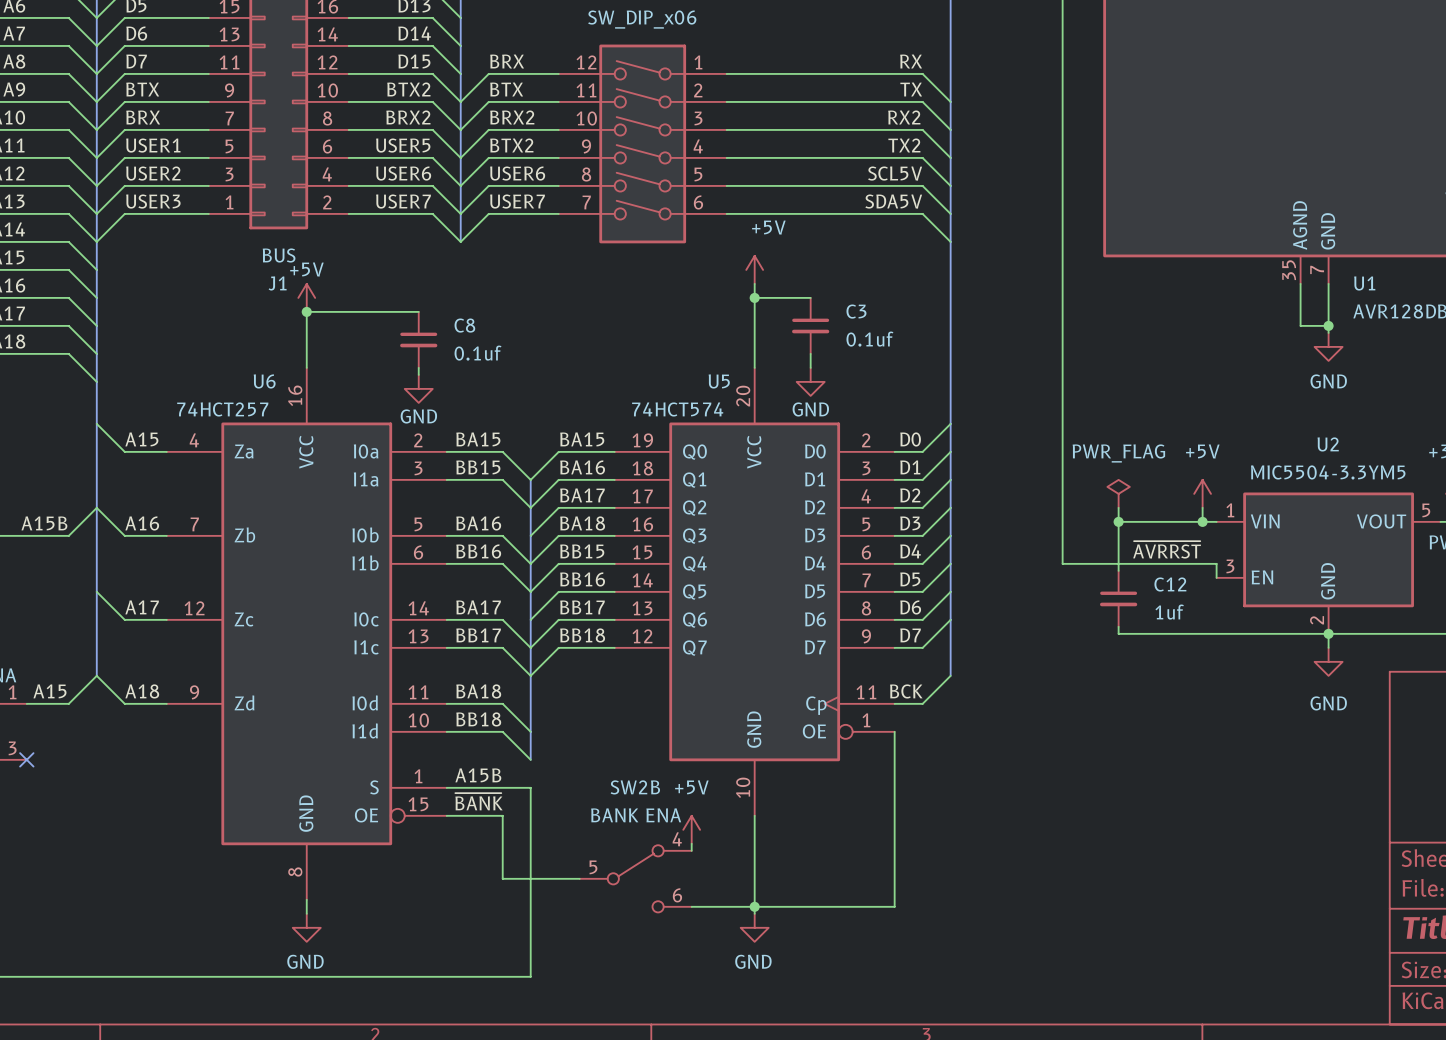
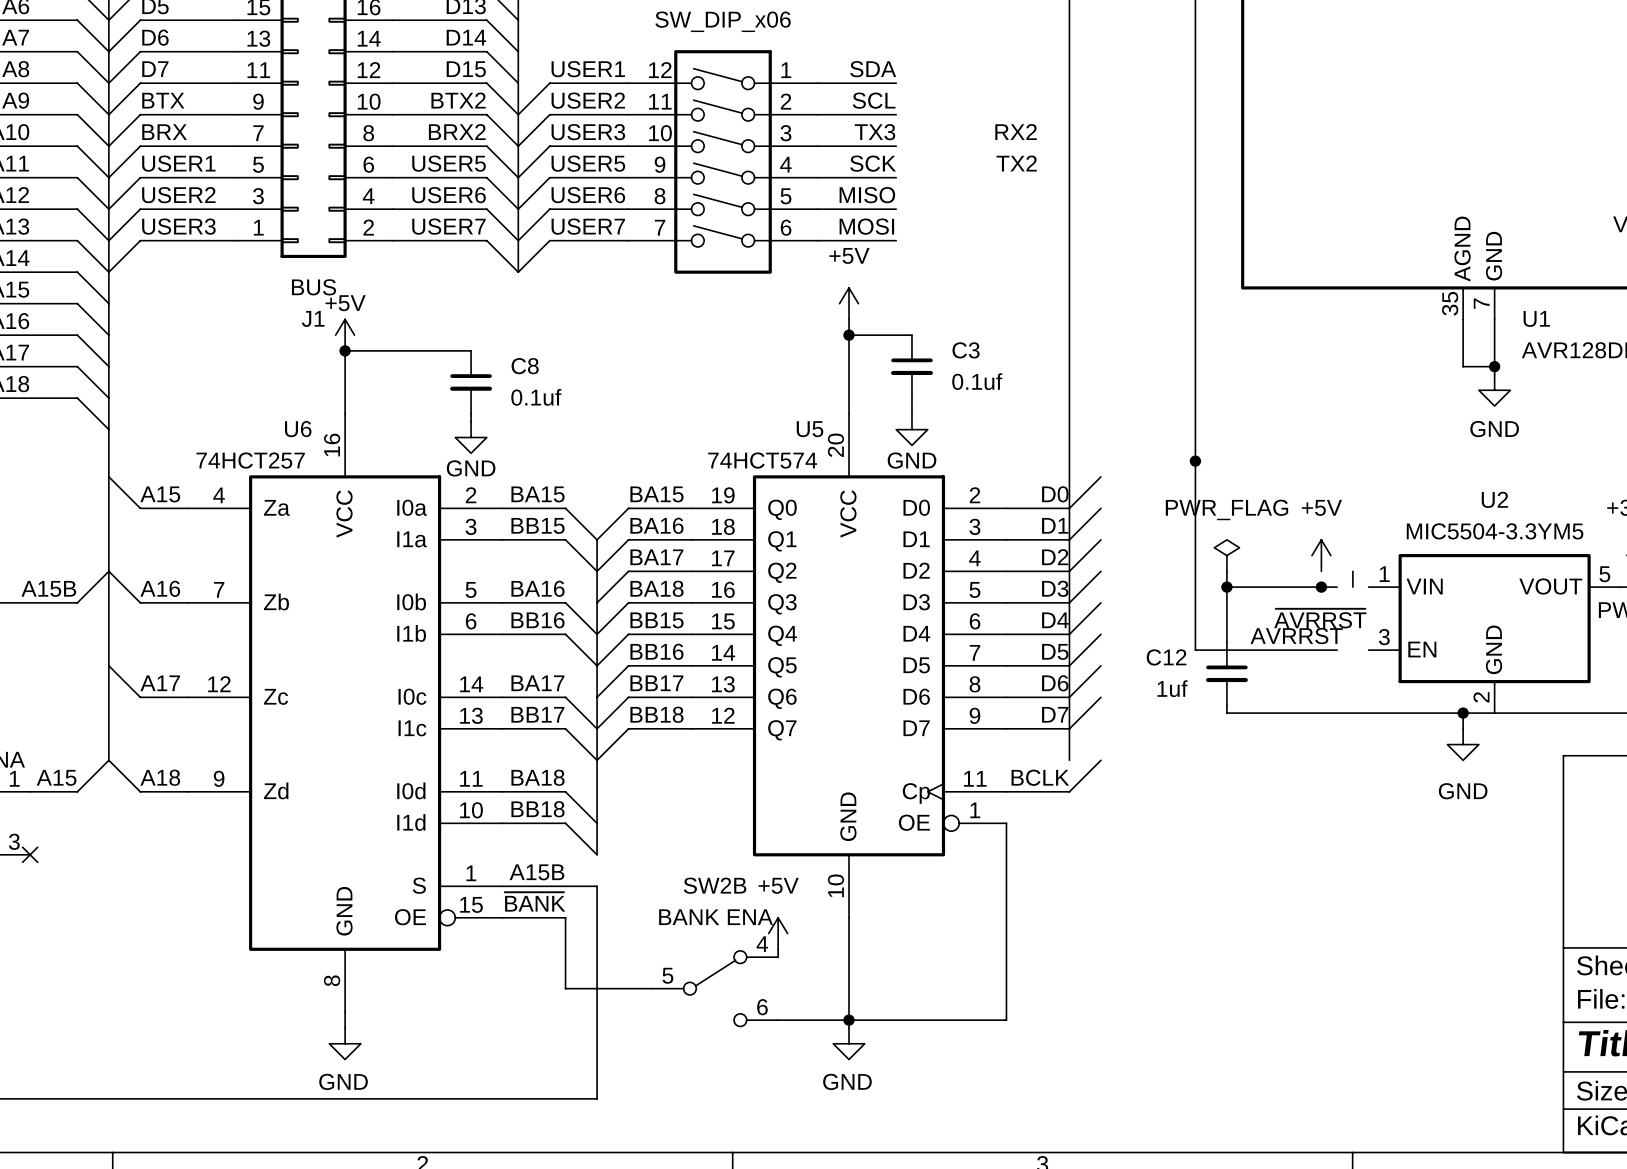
label: BRX (507, 61) -> USER1 (588, 69)
label: none -> SDA (873, 69)
label: RX (911, 61) -> none
wire: (796, 73) (922, 73) (950, 101) -> none
label: BTX (506, 89) -> USER2 (588, 100)
label: none -> SCL (874, 100)
label: TX (911, 89) -> none
wire: (796, 101) (922, 101) (950, 129) -> none
label: BRX2 (512, 117) -> USER3 (588, 132)
label: none -> TX3 (875, 132)
wire: (796, 129) (922, 129) (950, 157) -> none
label: BTX2 (511, 145) -> USER5 (588, 163)
label: none -> SCK (873, 163)
wire: (796, 157) (922, 157) (950, 185) -> none
label: none -> MISO (867, 195)
label: SCL5V (895, 173) -> none
wire: (796, 185) (922, 185) (950, 213) -> none
label: none -> MOSI (866, 226)
label: SDA5V (893, 201) -> none
wire: (796, 213) (922, 213) (950, 241) -> none
power symbol text position: +5V (768, 227) -> +5V (849, 255)
junction: none -> (1195, 461)
wire: (950, 423) (922, 451) -> (1100, 476) (1069, 508) (1037, 508)
label position: D0 (910, 439) -> D0 (1055, 494)
wire: (950, 451) (922, 479) -> (1100, 508) (1069, 539) (1037, 539)
label position: D1 (910, 467) -> D1 (1055, 525)
wire: (950, 479) (922, 507) -> (1100, 539) (1069, 571) (1037, 571)
power symbol position: PWR_FLAG (1118, 493) -> PWR_FLAG (1226, 555)
power symbol position: +5V (1202, 493) -> +5V (1321, 555)
label position: D2 (910, 495) -> D2 (1055, 557)
wire: (950, 507) (922, 535) -> (1100, 571) (1069, 602) (1037, 602)
wire: (1118, 507) (1118, 570) -> (1226, 571) (1226, 642)
junction: none -> (1226, 587)
junction: (1118, 521) -> none
junction: none -> (1321, 587)
wire: (1188, 521) (1216, 521) -> (1226, 587) (1258, 587)
junction: (1202, 521) -> none
label position: D3 (910, 523) -> D3 (1055, 588)
wire: (950, 535) (922, 563) -> (1100, 602) (1069, 634) (1037, 634)
label position: D4 (910, 551) -> D4 (1055, 620)
wire: (950, 563) (922, 591) -> (1100, 634) (1069, 665) (1037, 665)
wire: (1062, 563) (1216, 563) (1216, 577) -> (1195, 634) (1195, 650) (1337, 650)
label: none -> AVRRST (1296, 636)
label position: D5 (910, 579) -> D5 (1055, 651)
C12 name position: C12 (1170, 584) -> C12 (1166, 657)
wire: (950, 591) (922, 619) -> (1100, 665) (1069, 697) (1037, 697)
C12 position: (1118, 598) -> (1226, 673)
label position: D6 (910, 607) -> D6 (1055, 683)
C12 value position: 1uf (1169, 612) -> 1uf (1172, 688)
wire: (950, 619) (922, 647) -> (1100, 697) (1069, 728) (1037, 728)
wire: (1118, 626) (1118, 633) -> (1226, 705) (1226, 713) (1258, 713)
wire: (1328, 633) (1328, 647) -> (1463, 713) (1463, 728)
junction position: (1328, 633) -> (1463, 713)
label position: D7 (910, 635) -> D7 (1055, 714)
power symbol position: GND (1328, 661) -> GND (1463, 744)
wire: (950, 675) (922, 703) -> (1100, 760) (1069, 791) (1037, 791)
label: BCK (906, 691) -> BCLK (1040, 777)

